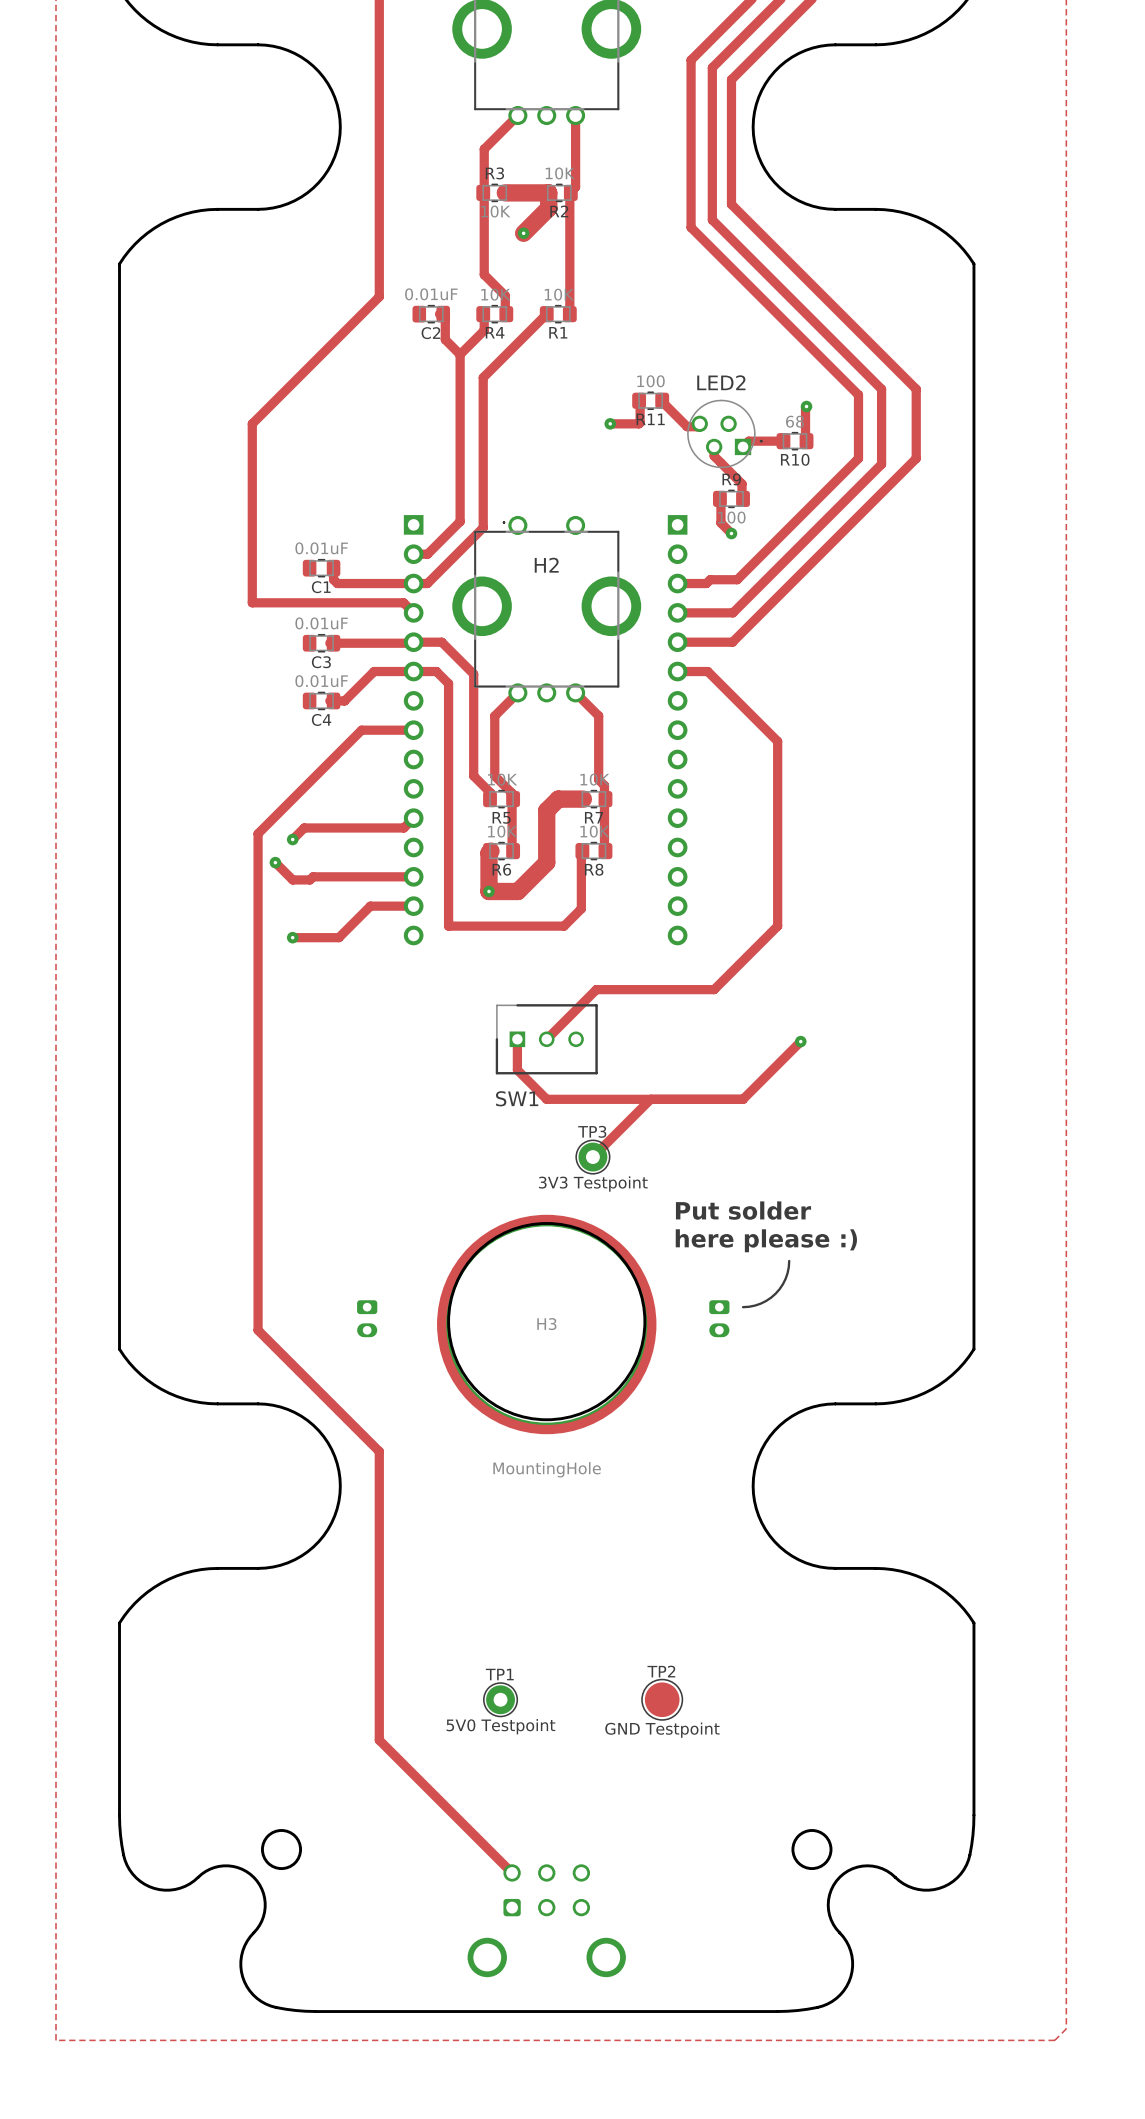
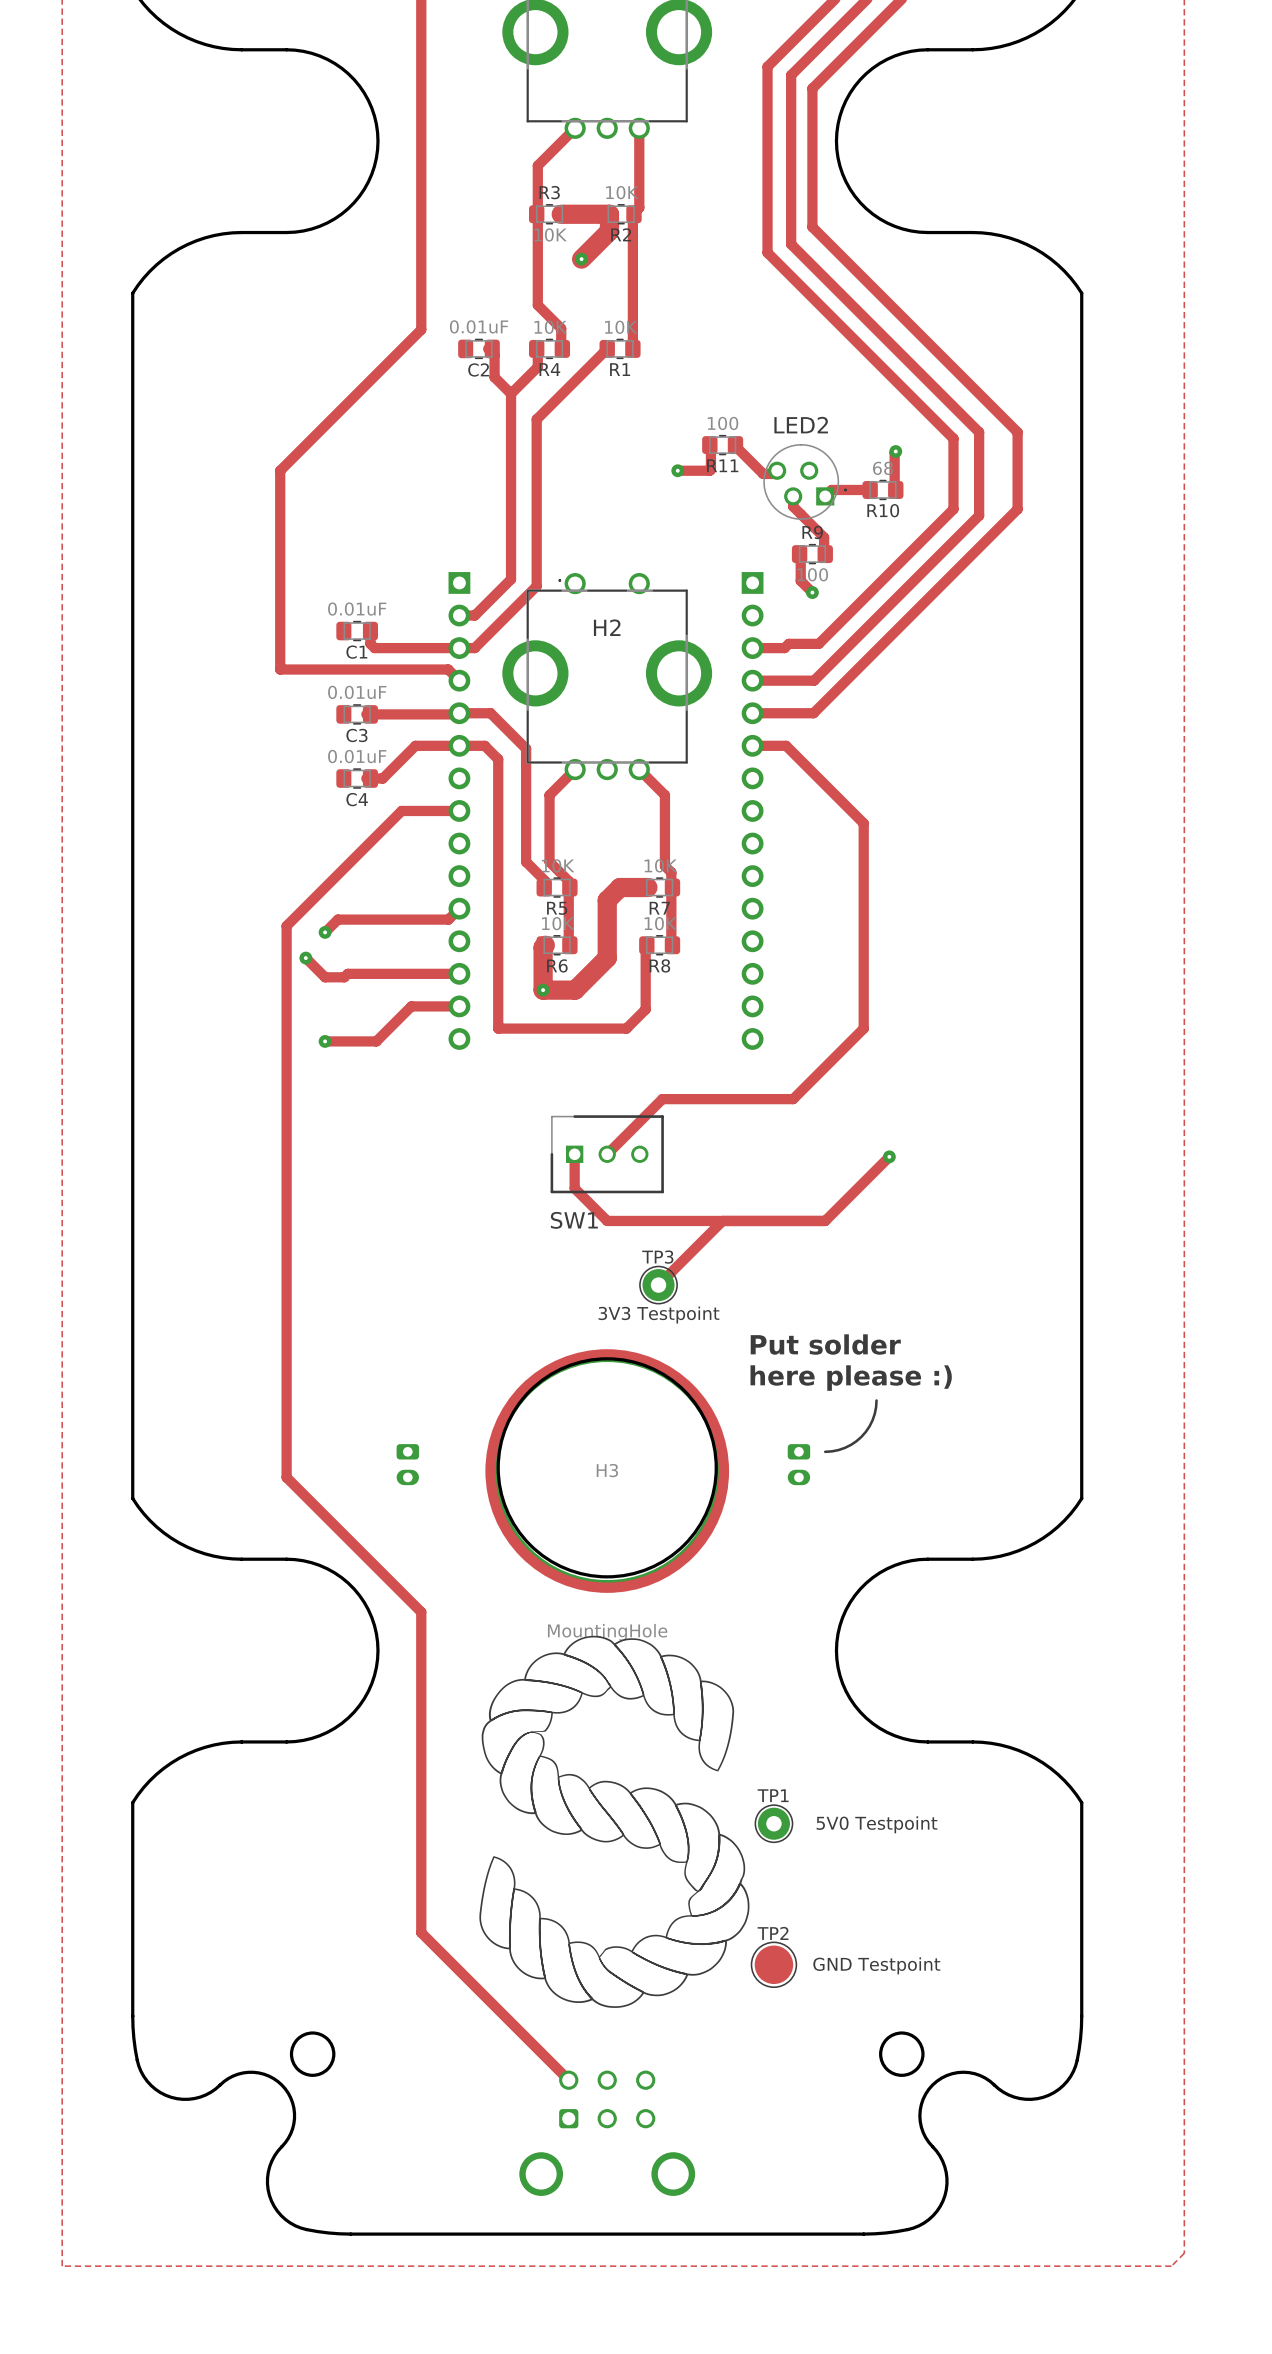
drawing: none -> [479, 1635, 750, 2008]
TP1 position: (500, 1699) -> (773, 1823)
TP2 position: (662, 1699) -> (773, 1964)
TP1 value position: 5V0 Testpoint (500, 1726) -> 5V0 Testpoint (877, 1824)
TP2 value position: GND Testpoint (662, 1730) -> GND Testpoint (876, 1965)

